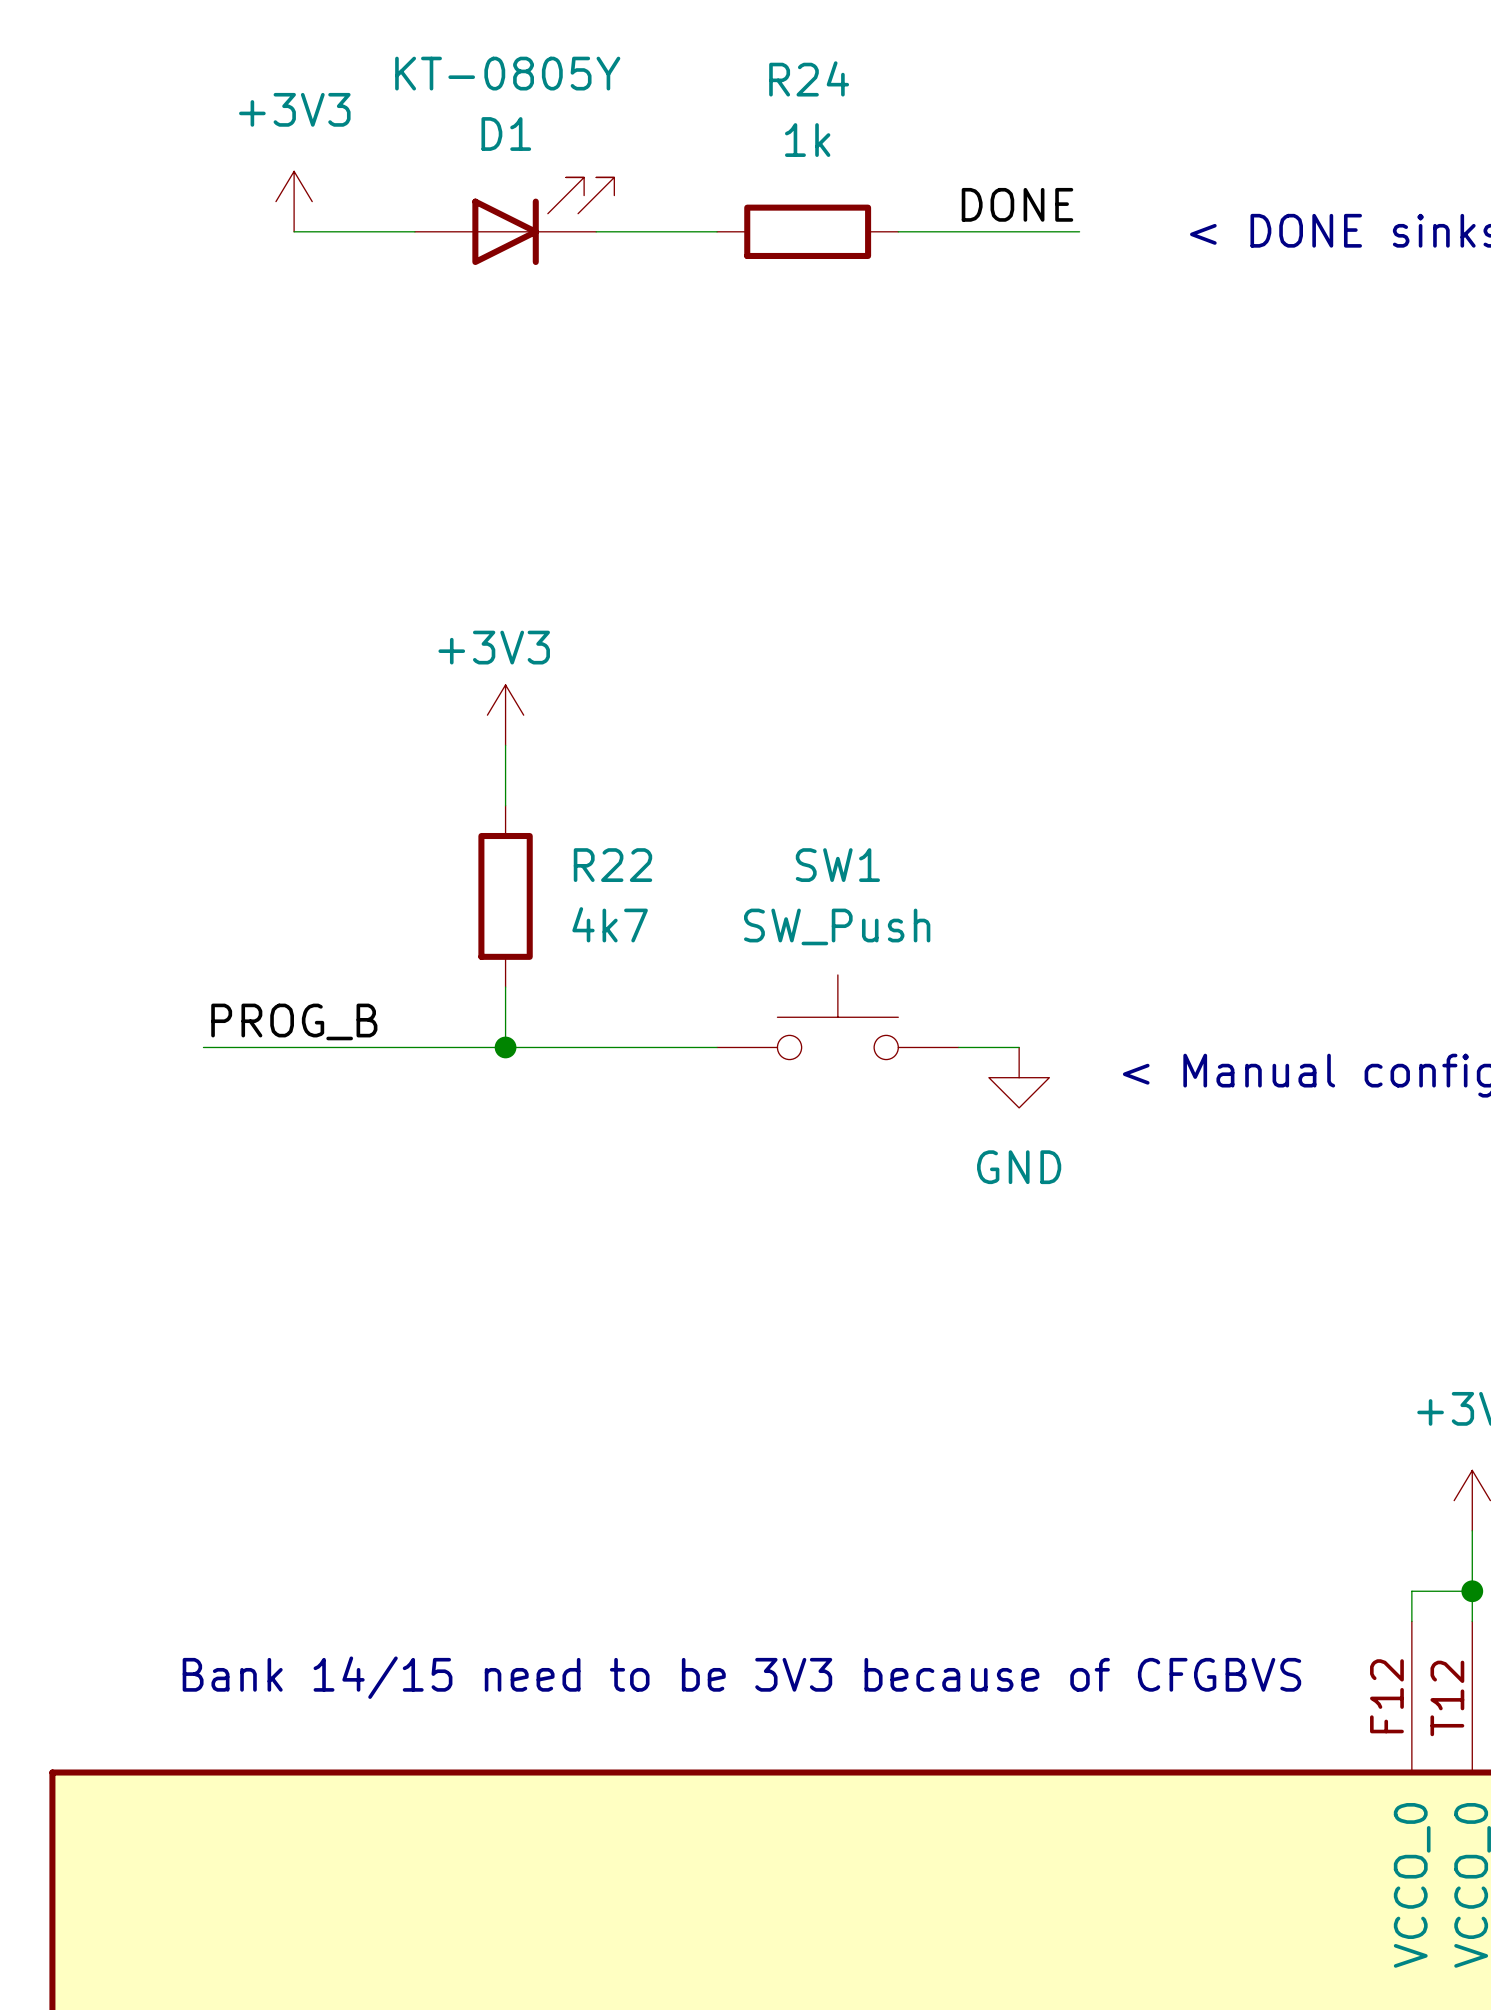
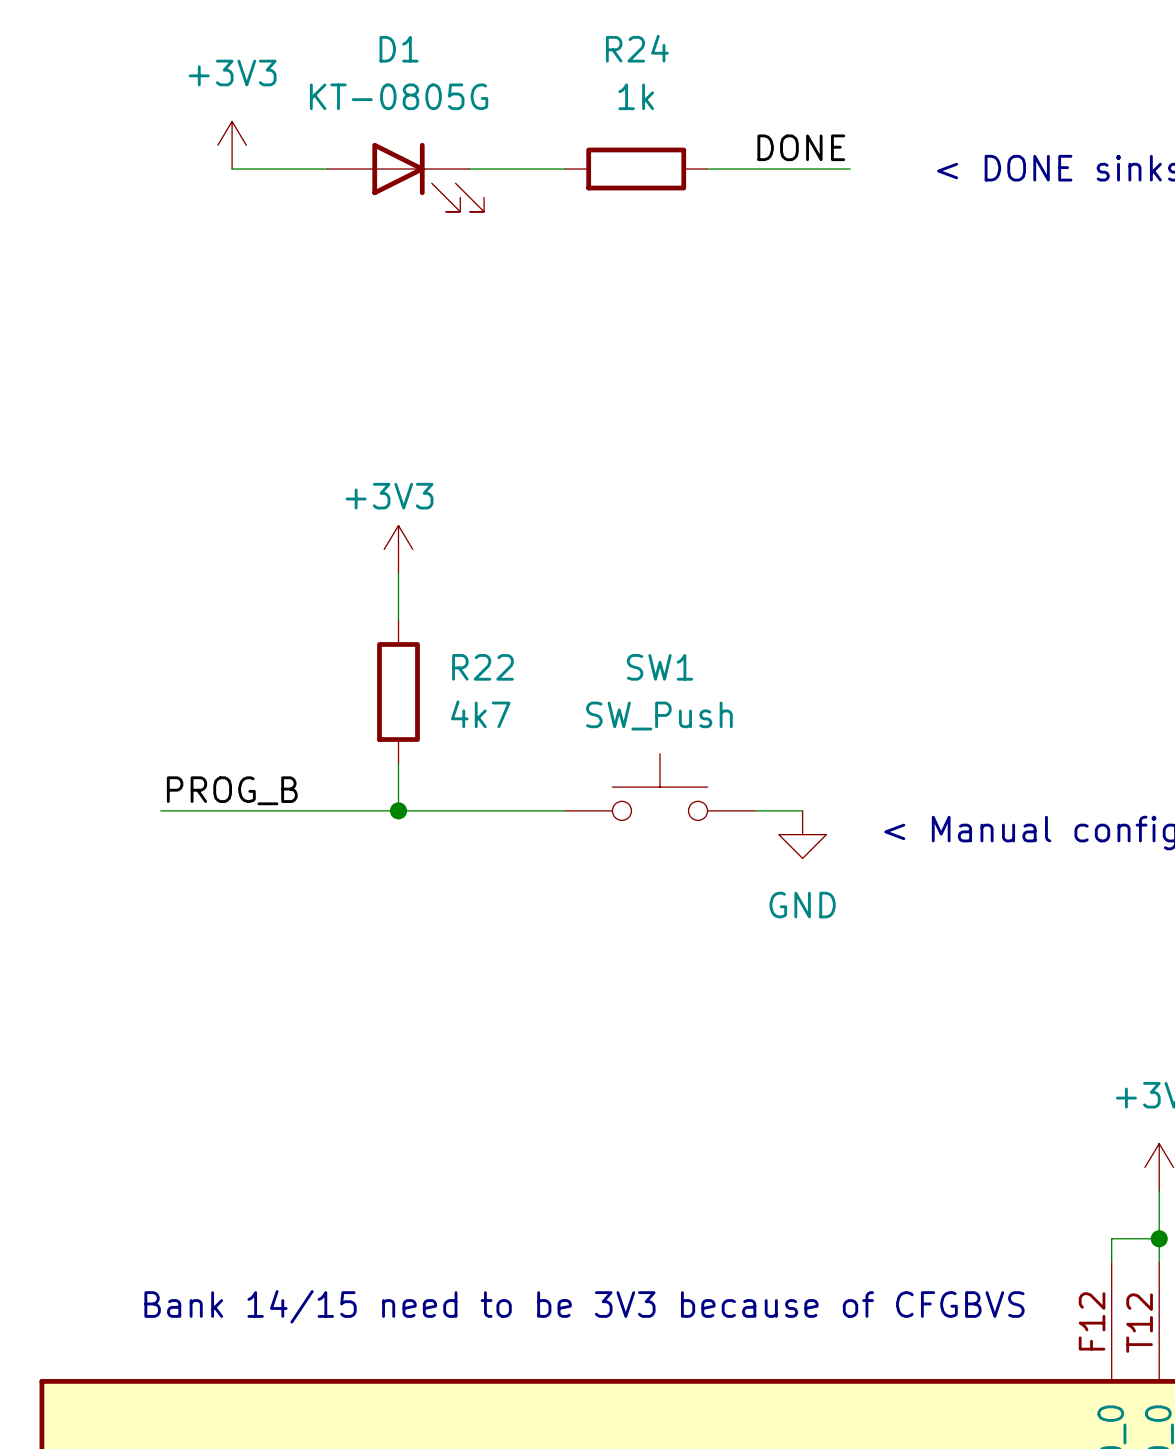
D1 value: KT-0805Y (507, 73) -> KT-0805G (399, 96)
D1 name position: D1 (506, 134) -> D1 (399, 49)
D1 flip: as is (543, 221) -> up-down (428, 177)

